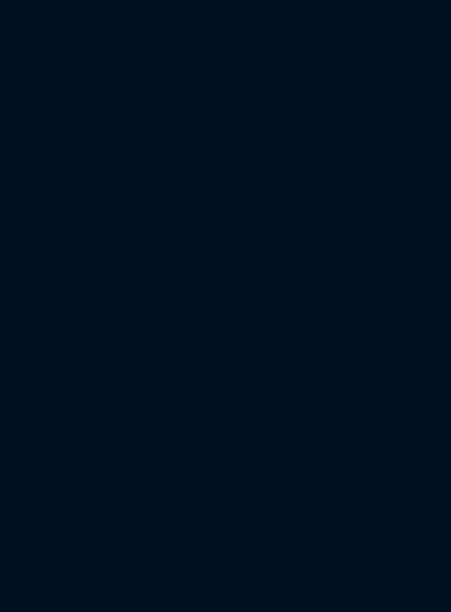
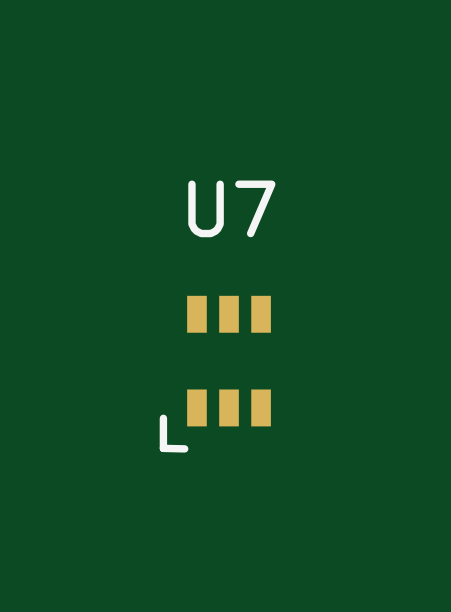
U7: none -> (215, 374)

